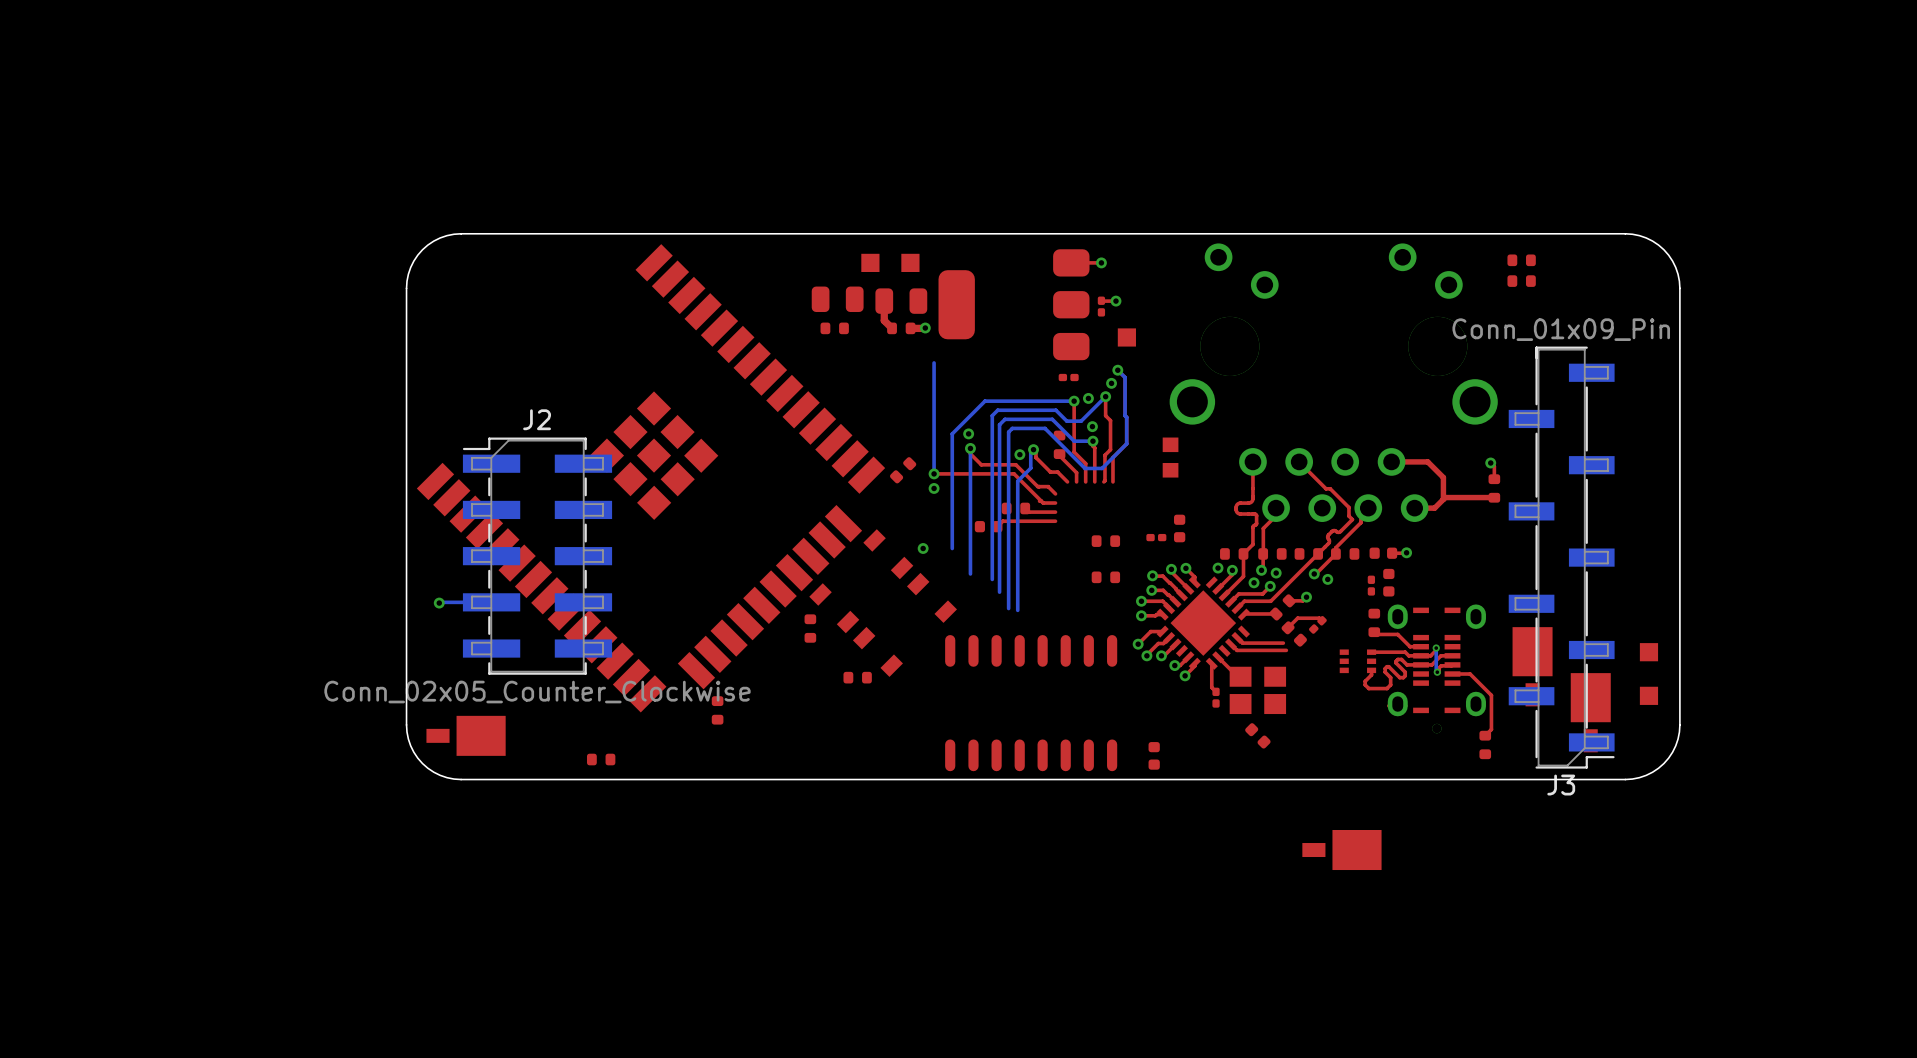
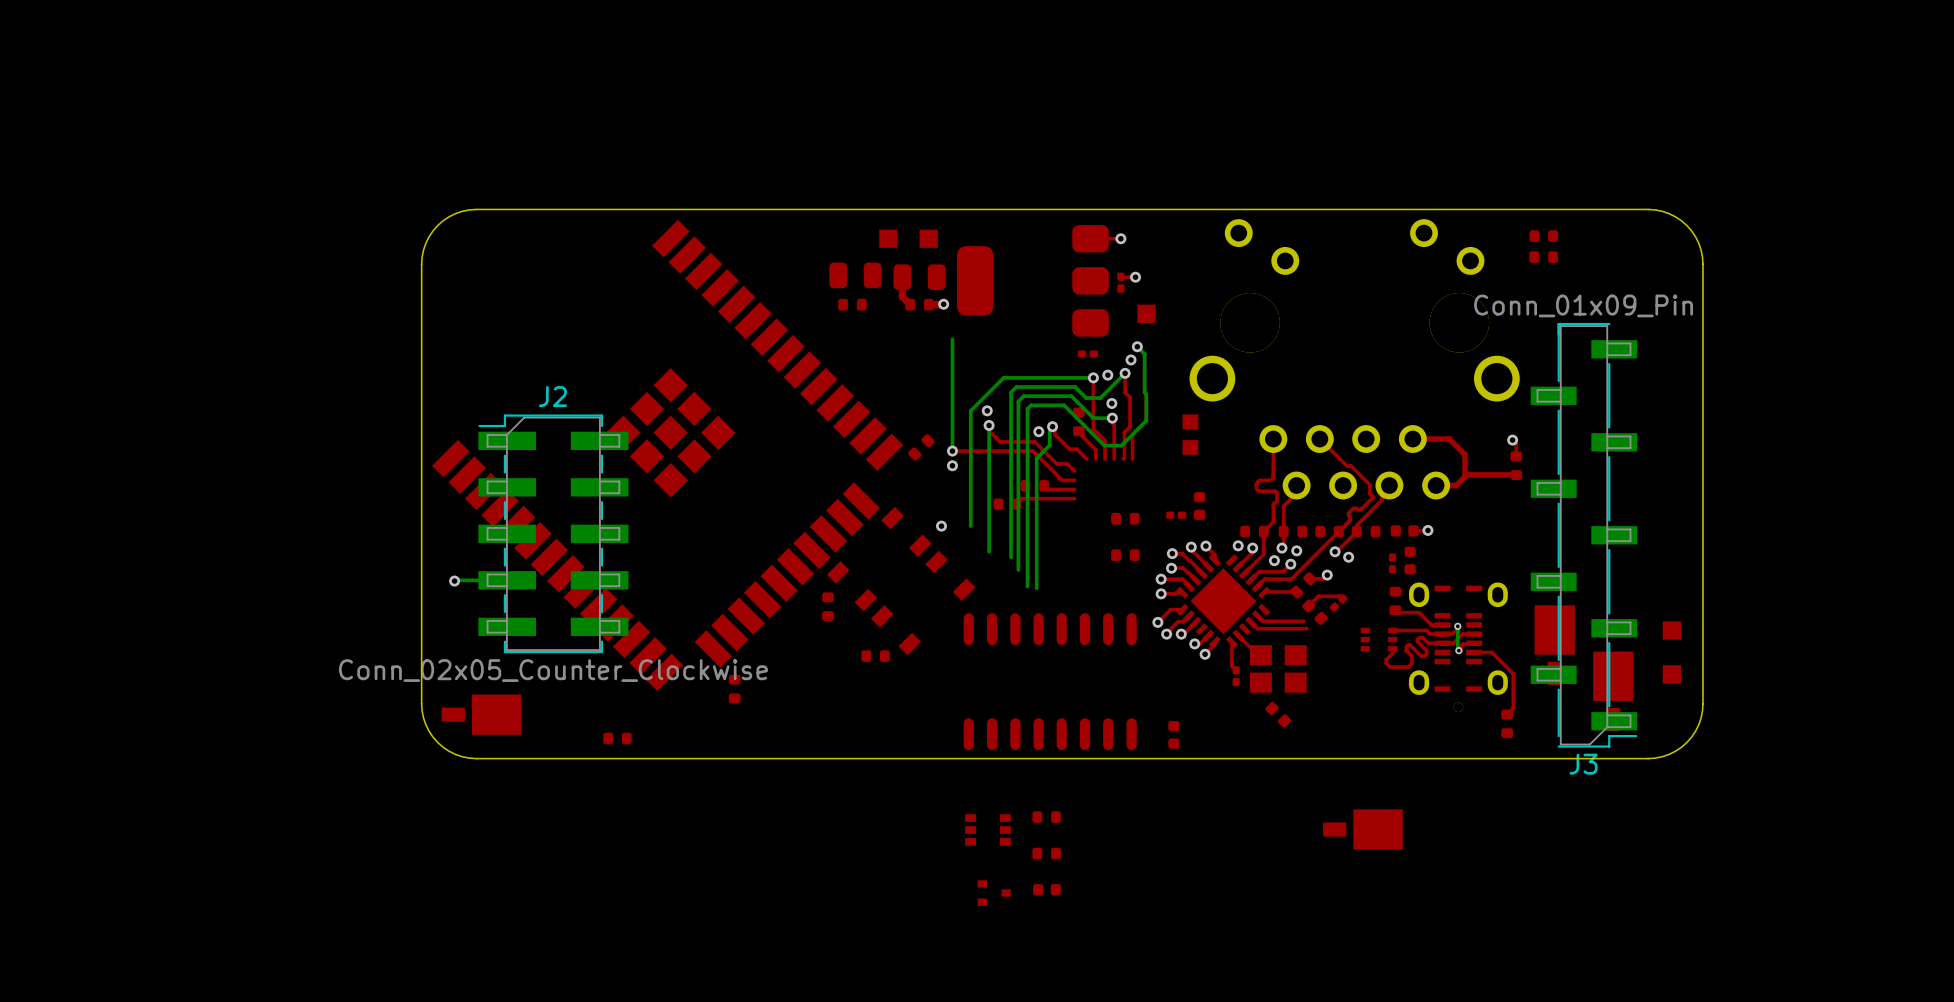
part: none -> (1046, 817)
part: none -> (987, 829)
part: none -> (1046, 853)
part: none -> (1047, 889)
part: none -> (994, 893)

